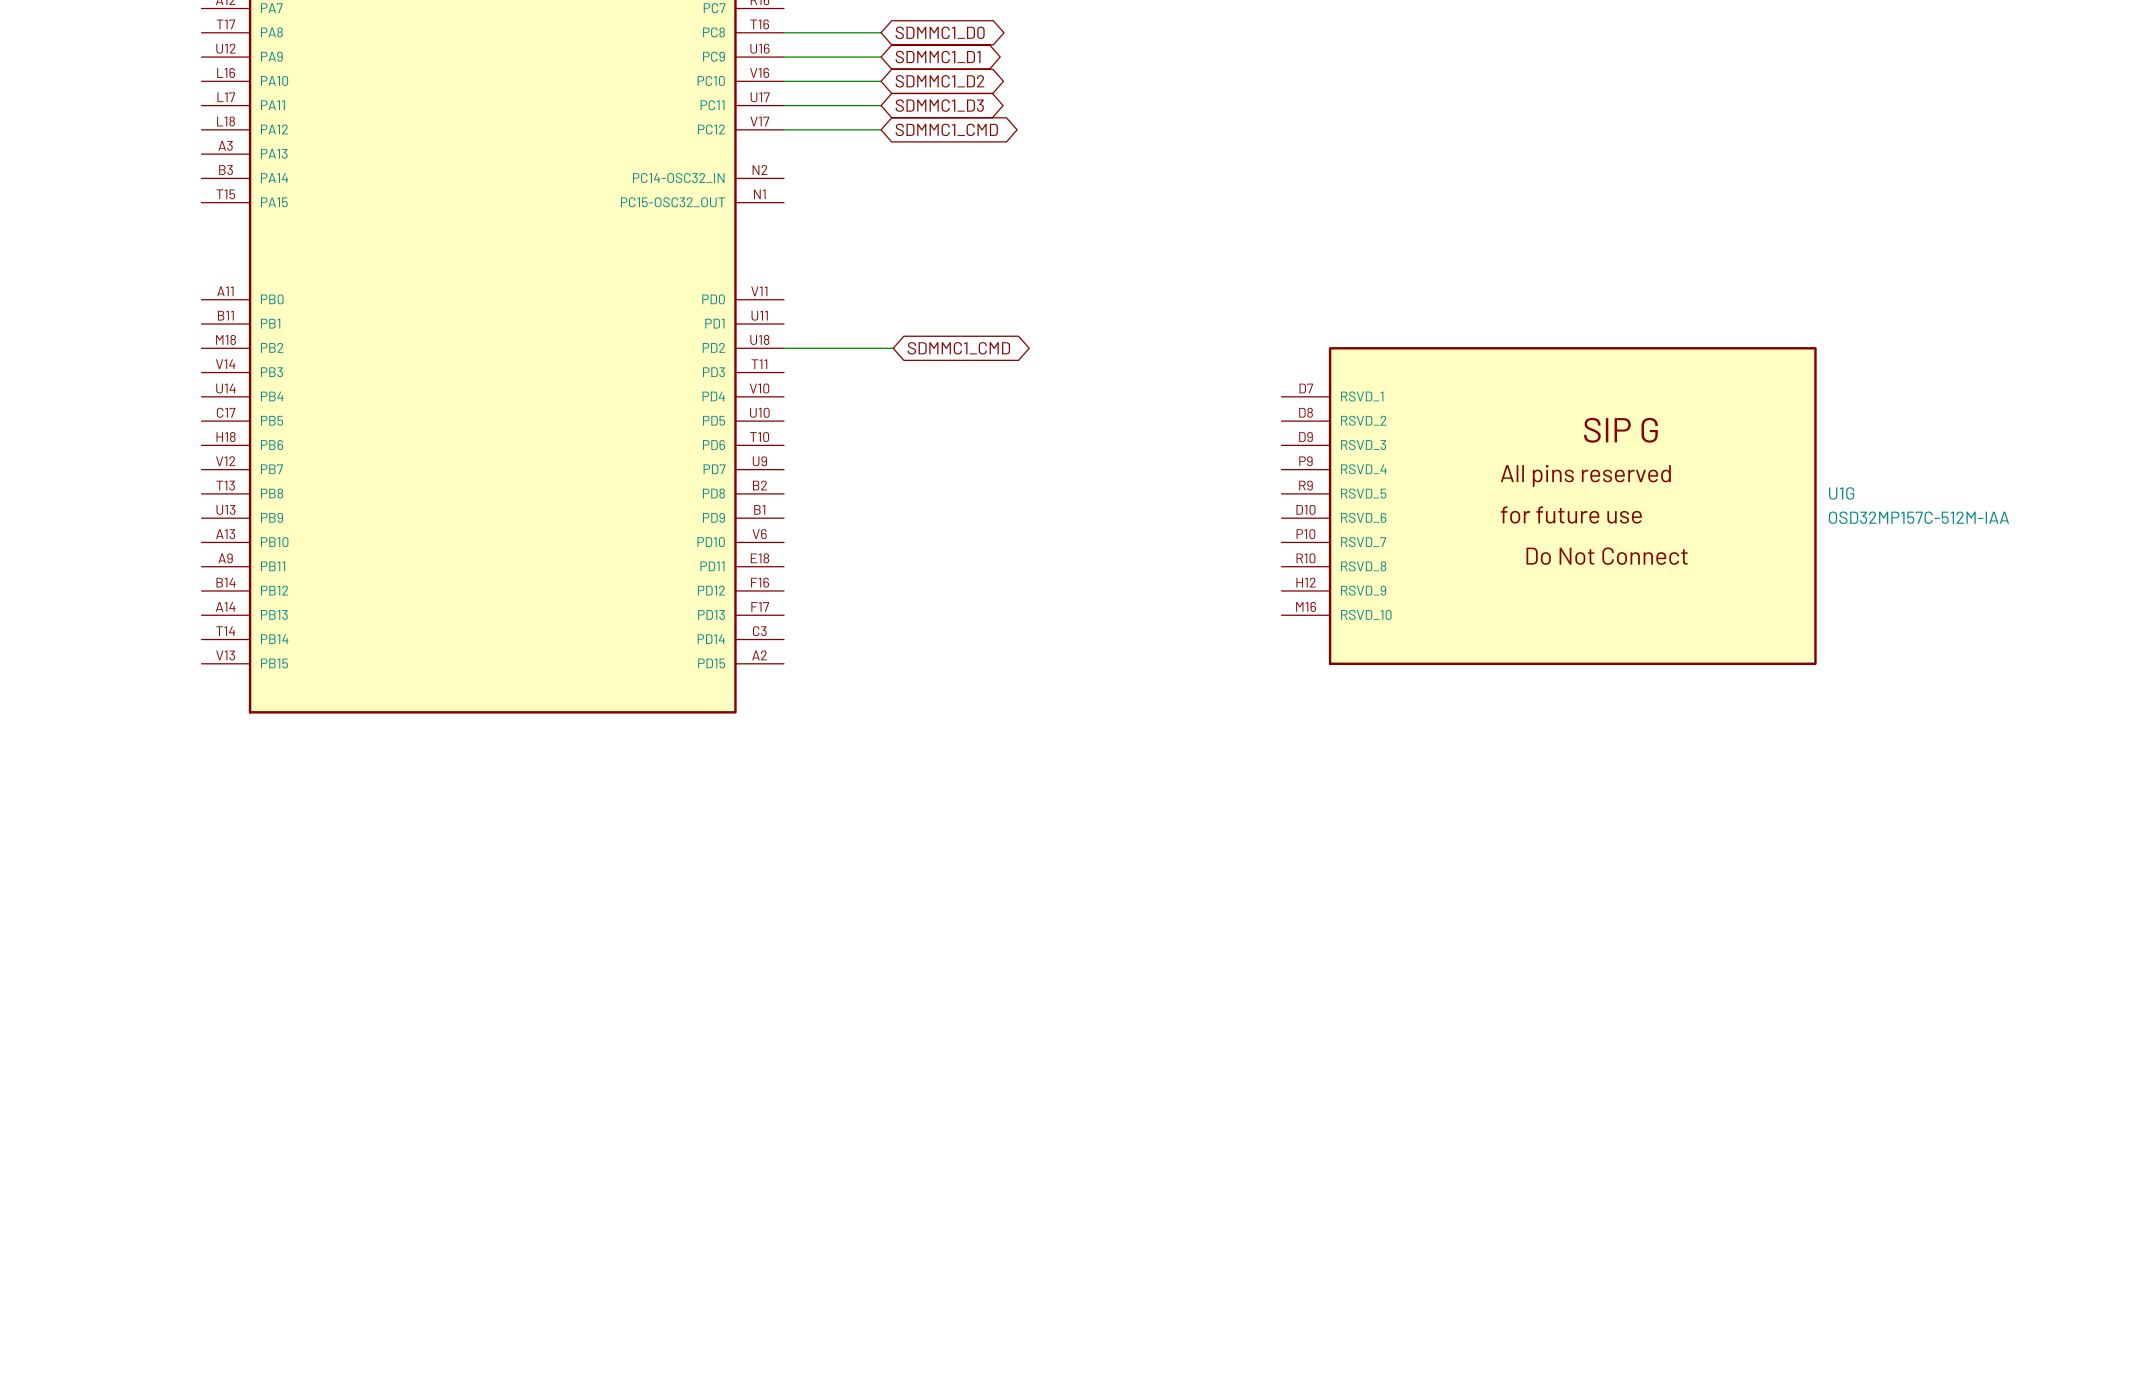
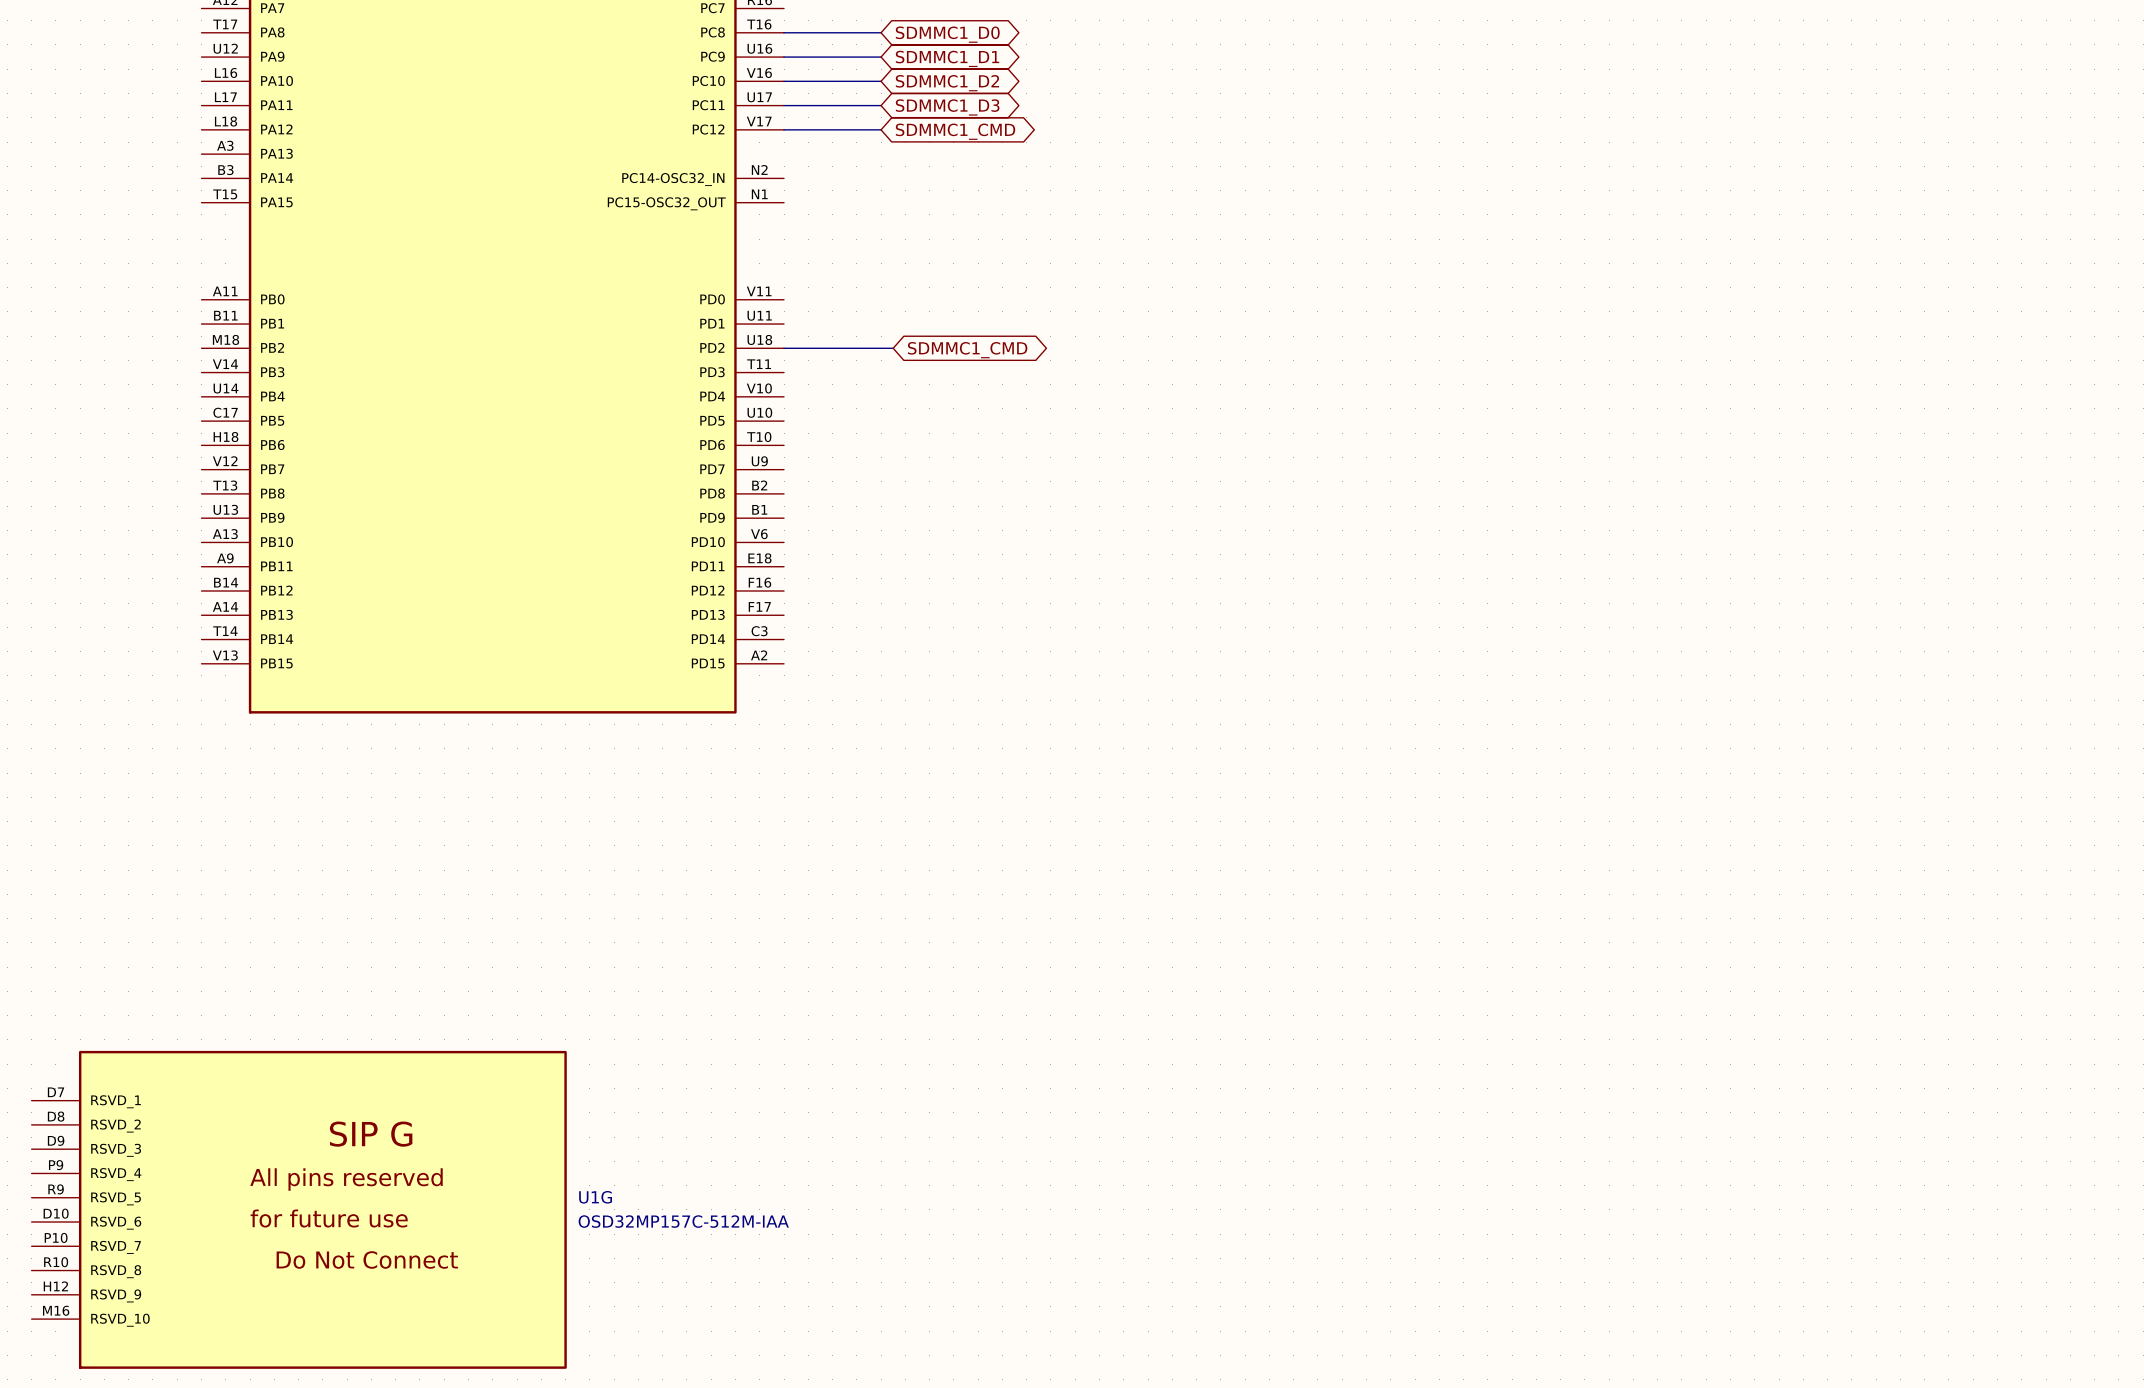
U1G position: (1549, 506) -> (299, 1209)

